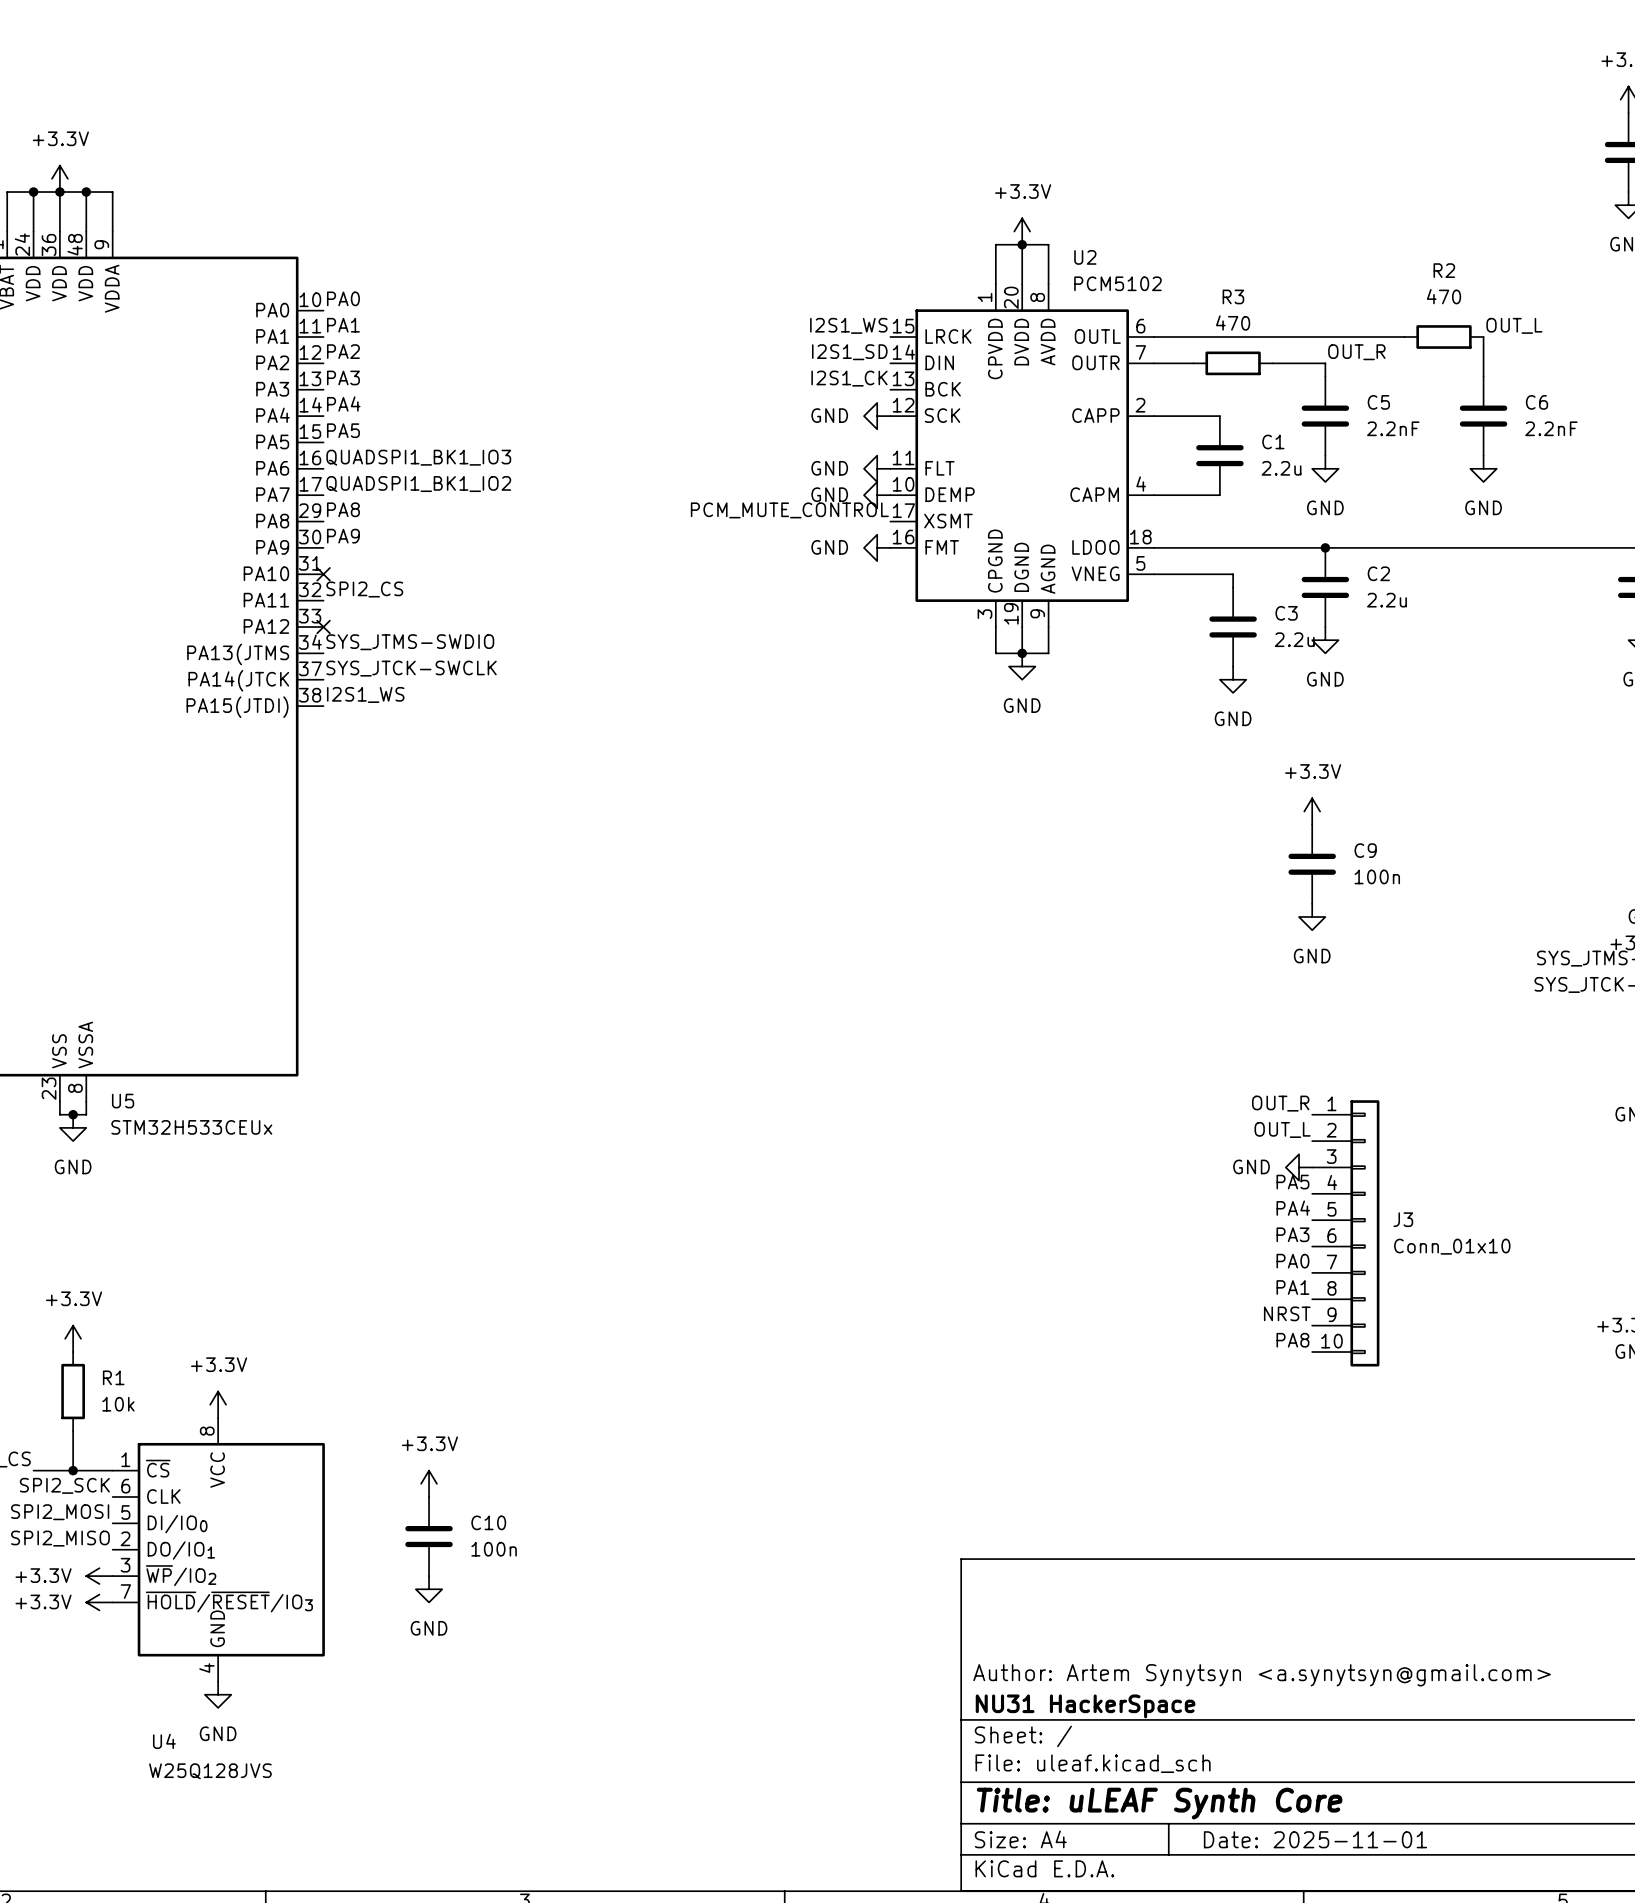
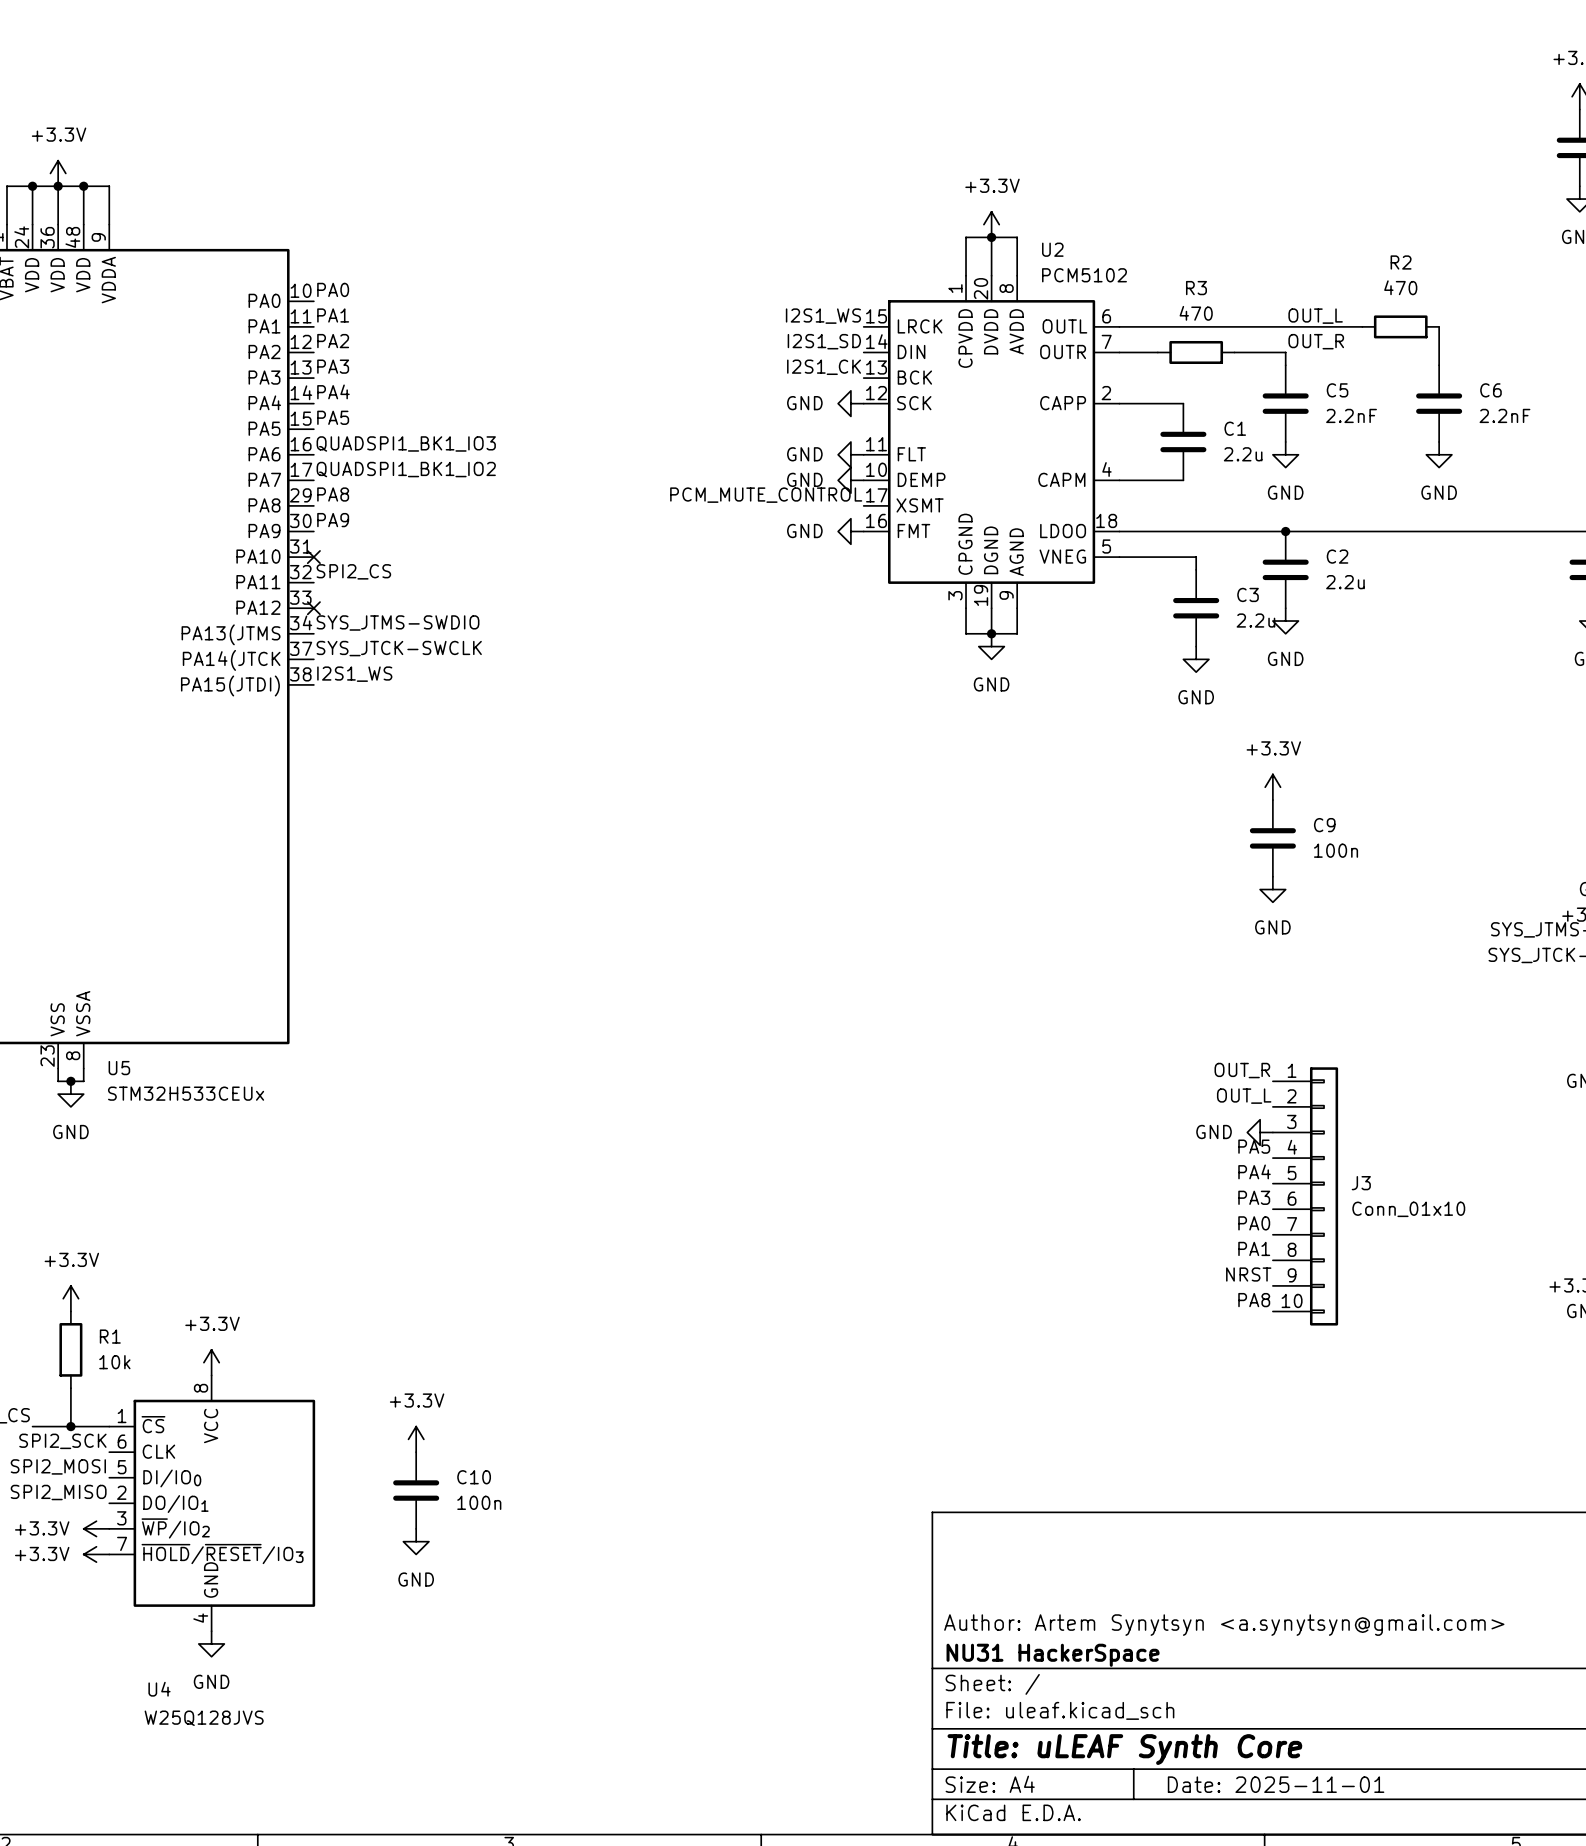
label position: OUT_L (1514, 325) -> OUT_L (1315, 316)

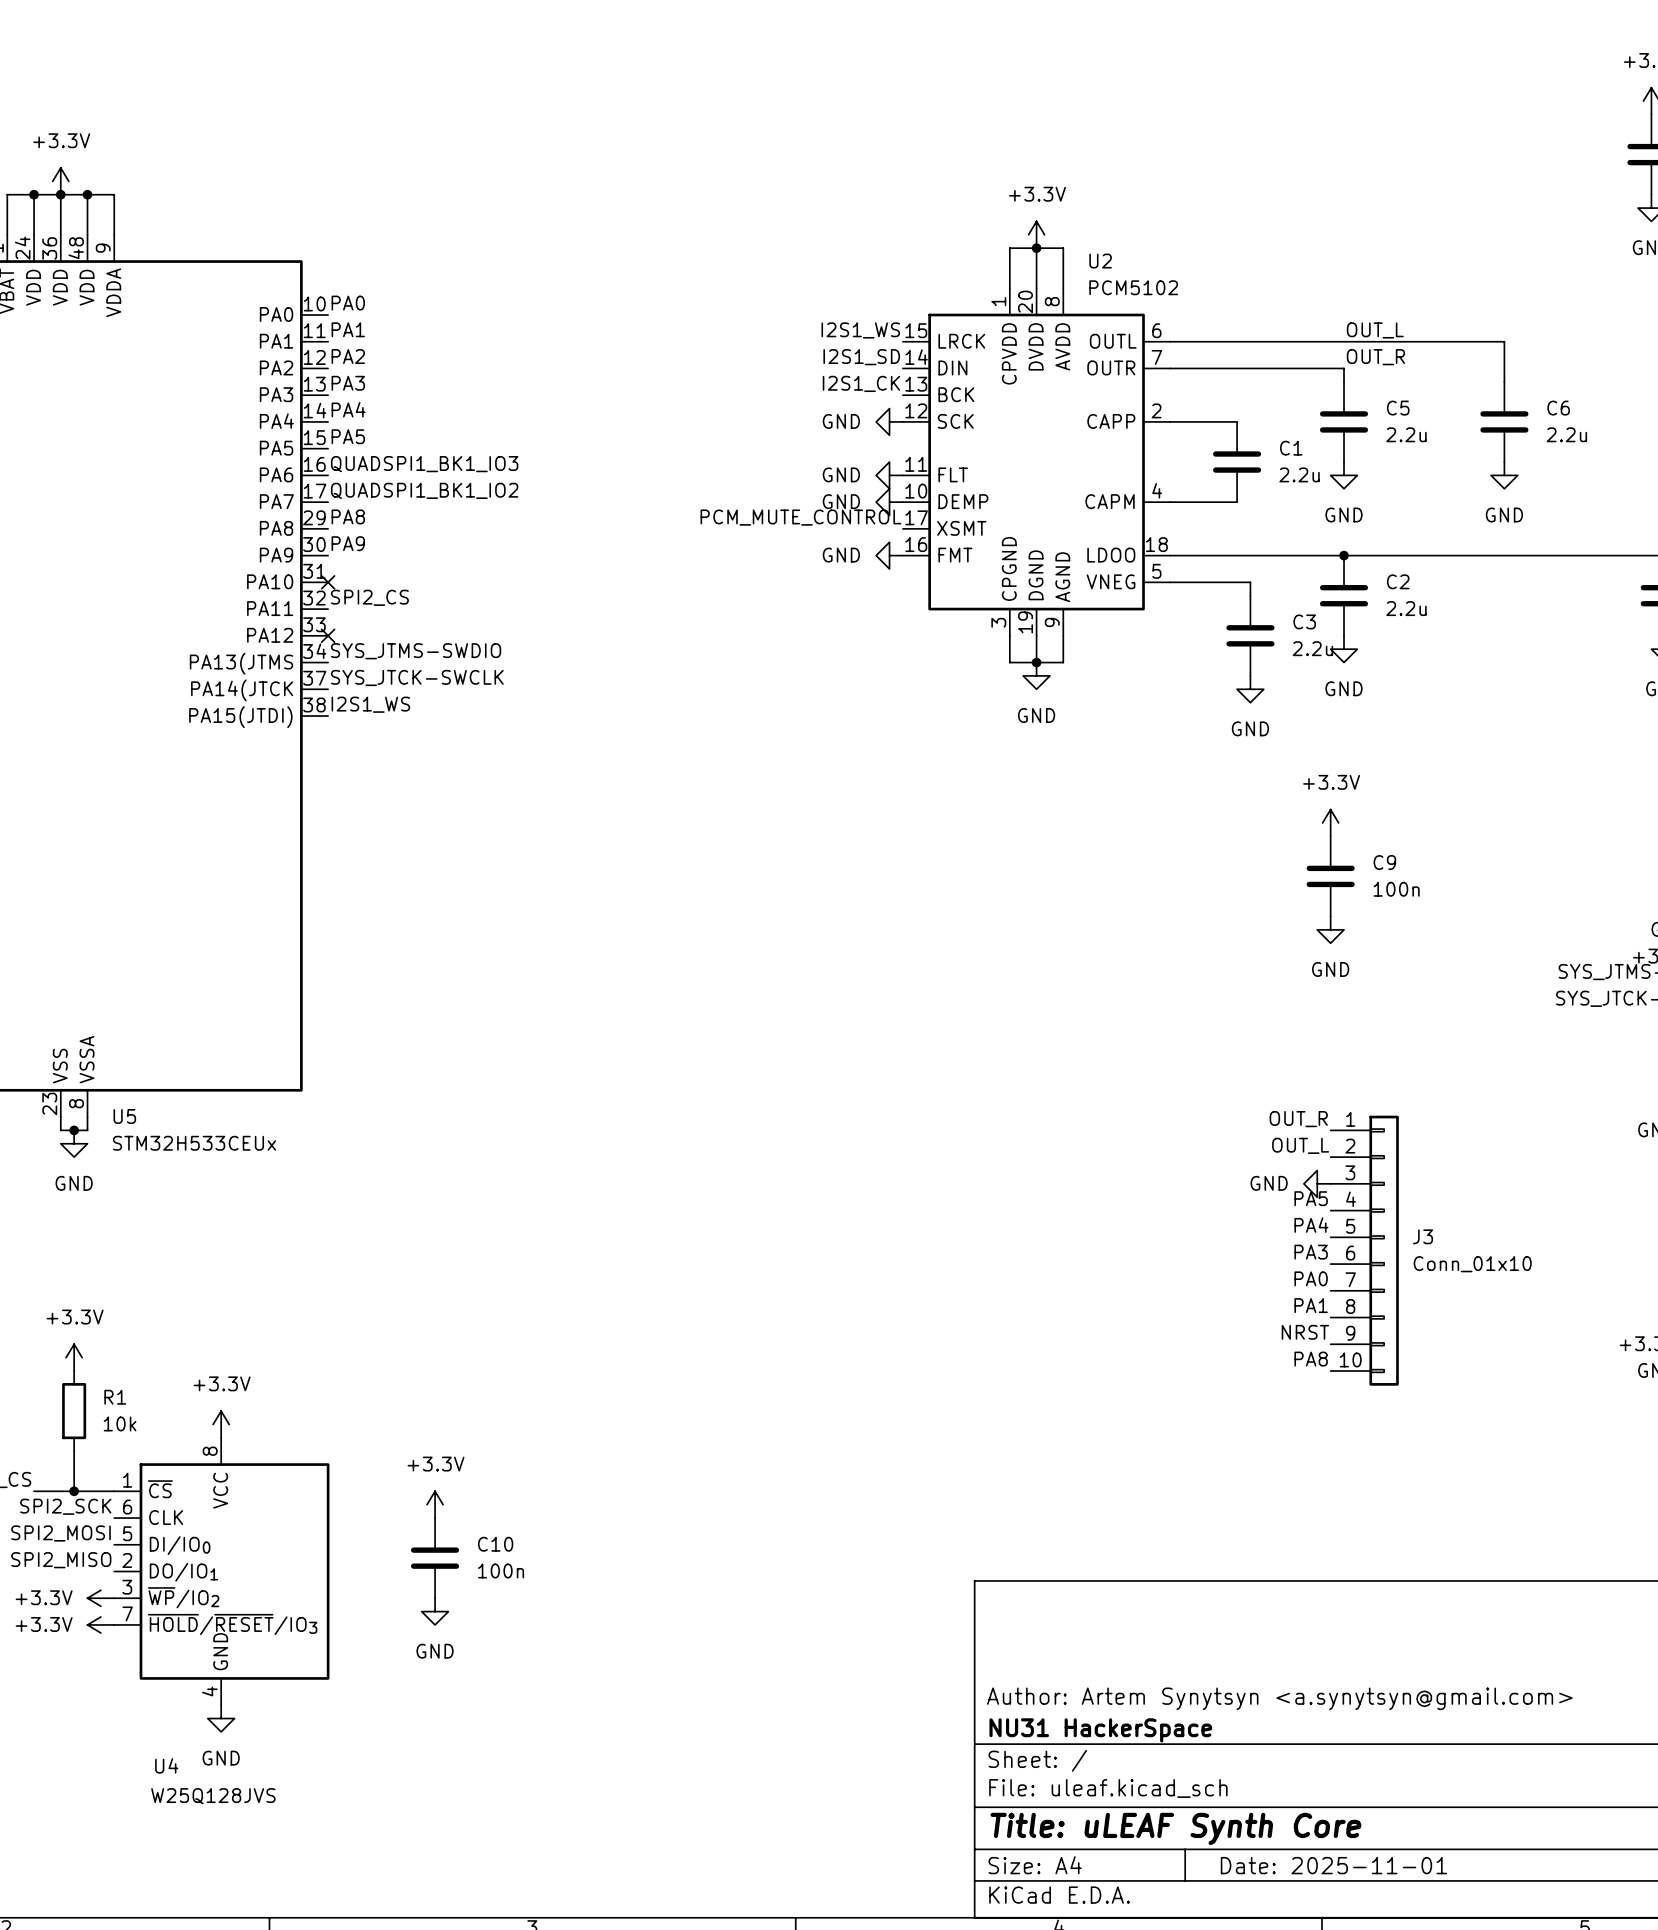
wire: none -> (1424, 341) (1504, 341)
R2: 470 (1400, 326) -> none
wire: none -> (1210, 368) (1290, 368)
R3: 470 (1196, 352) -> none
C5 value: 2.2nF (1351, 415) -> 2.2u (1406, 434)
C6 value: 2.2nF (1504, 415) -> 2.2u (1566, 434)

